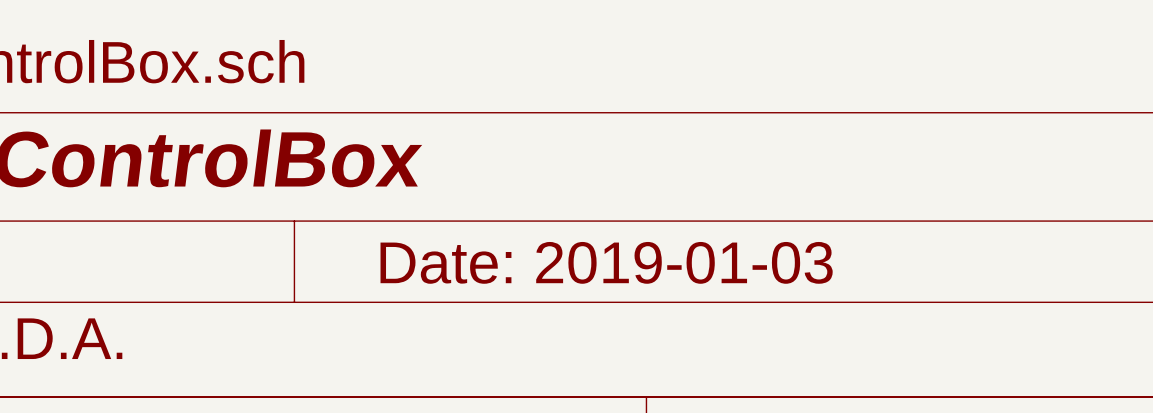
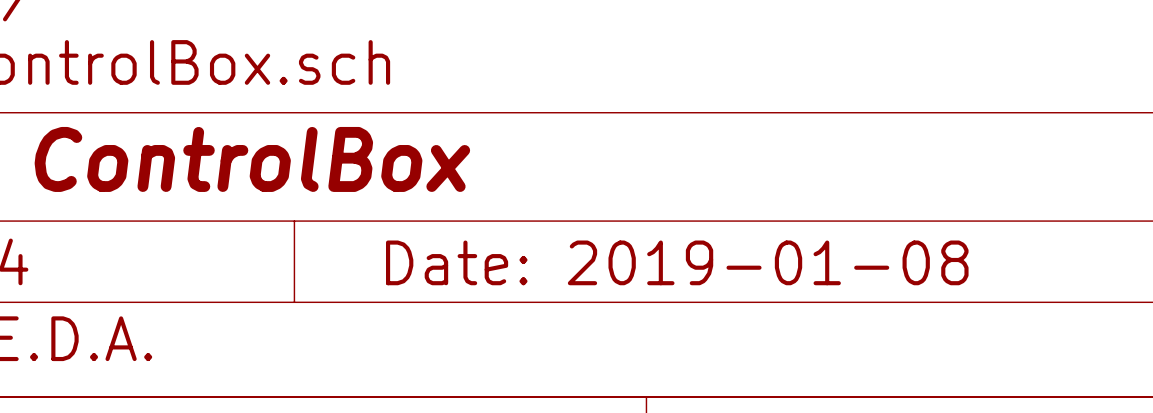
title block: Date: 2019-01-03 (606, 262) -> Date: 2019-01-08 (677, 262)

